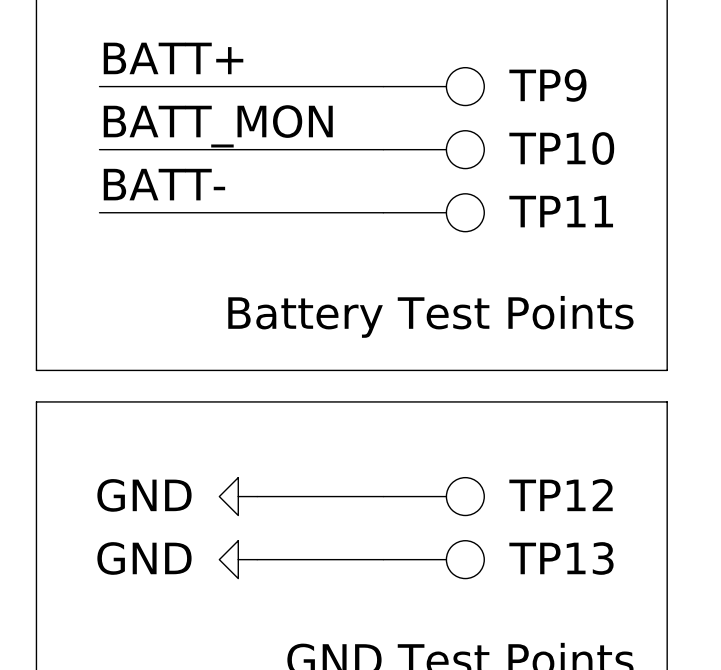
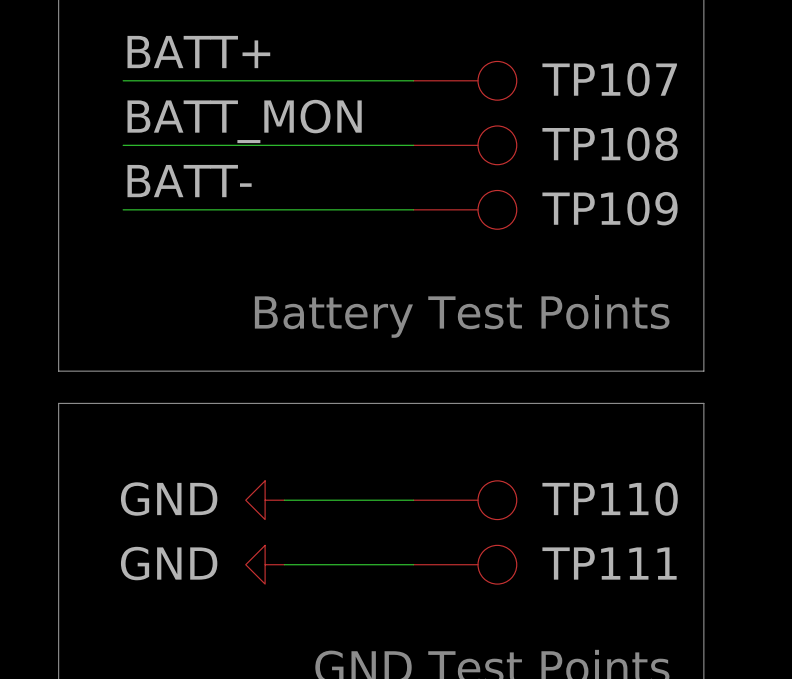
TP9 name: TP9 (547, 85) -> TP107 (609, 79)
TP10 name: TP10 (561, 148) -> TP108 (610, 144)
TP11 name: TP11 (561, 211) -> TP109 (610, 208)
TP12 name: TP12 (561, 495) -> TP110 (610, 499)
TP13 name: TP13 (561, 558) -> TP111 (609, 563)

